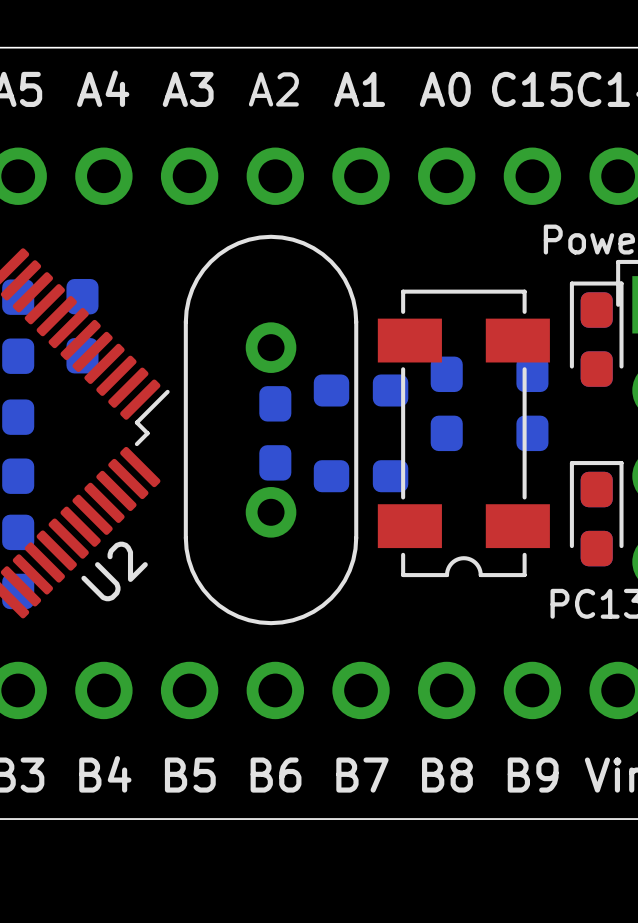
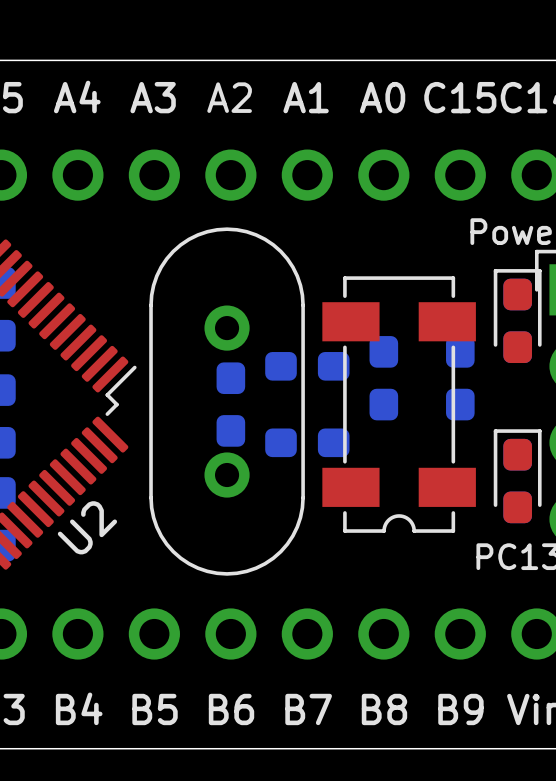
part: (82, 326) -> none

